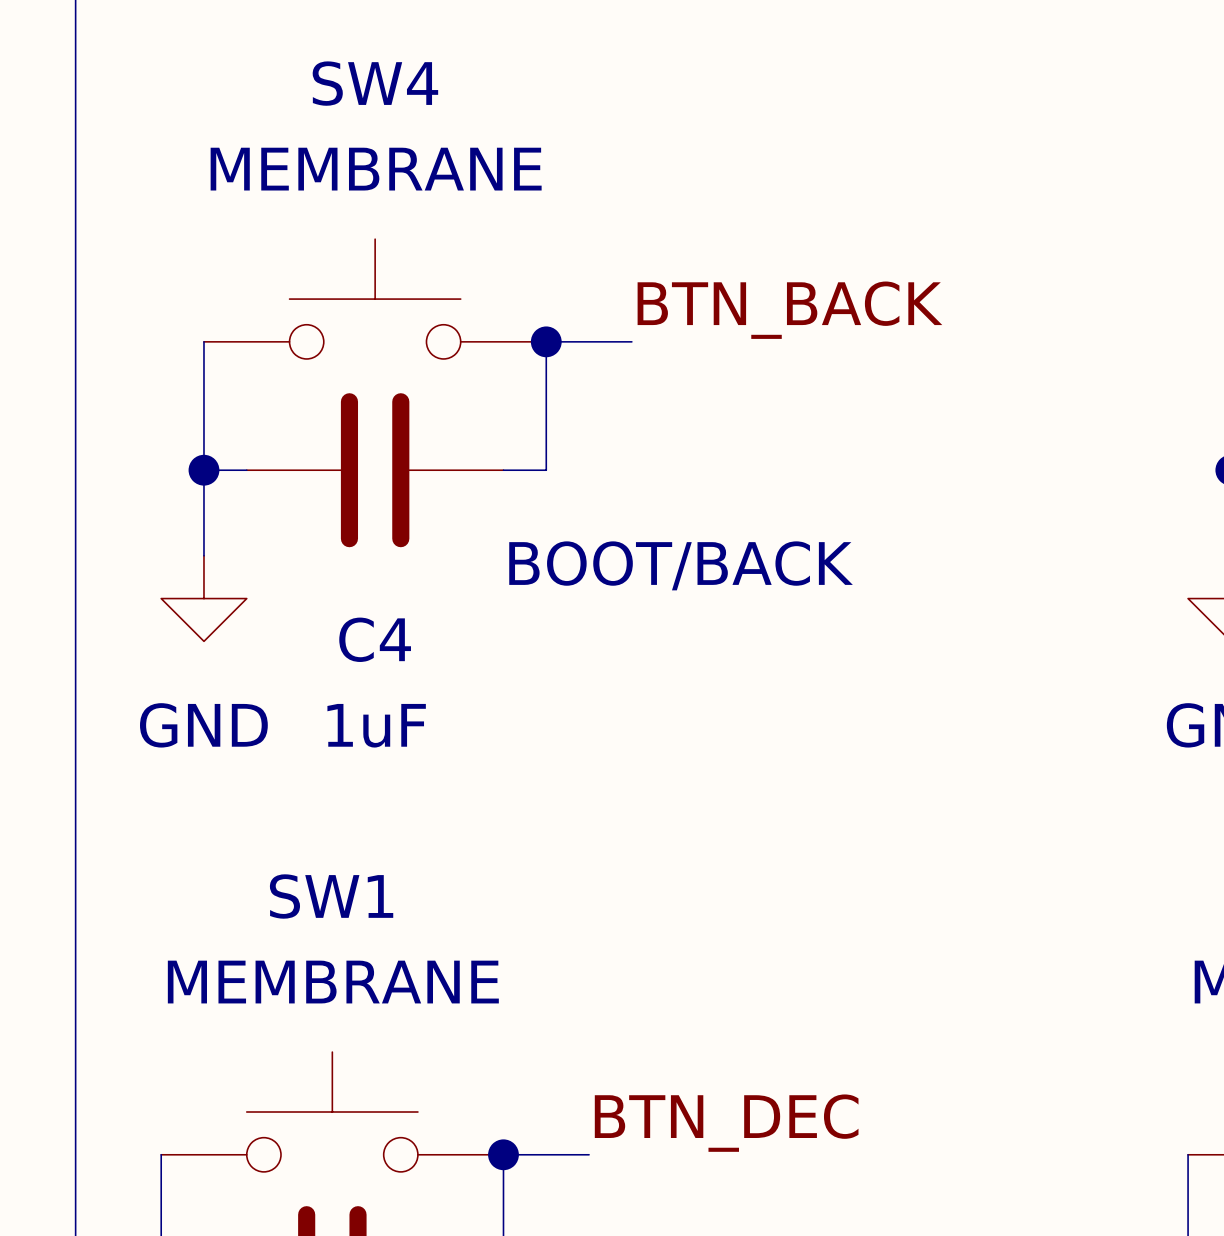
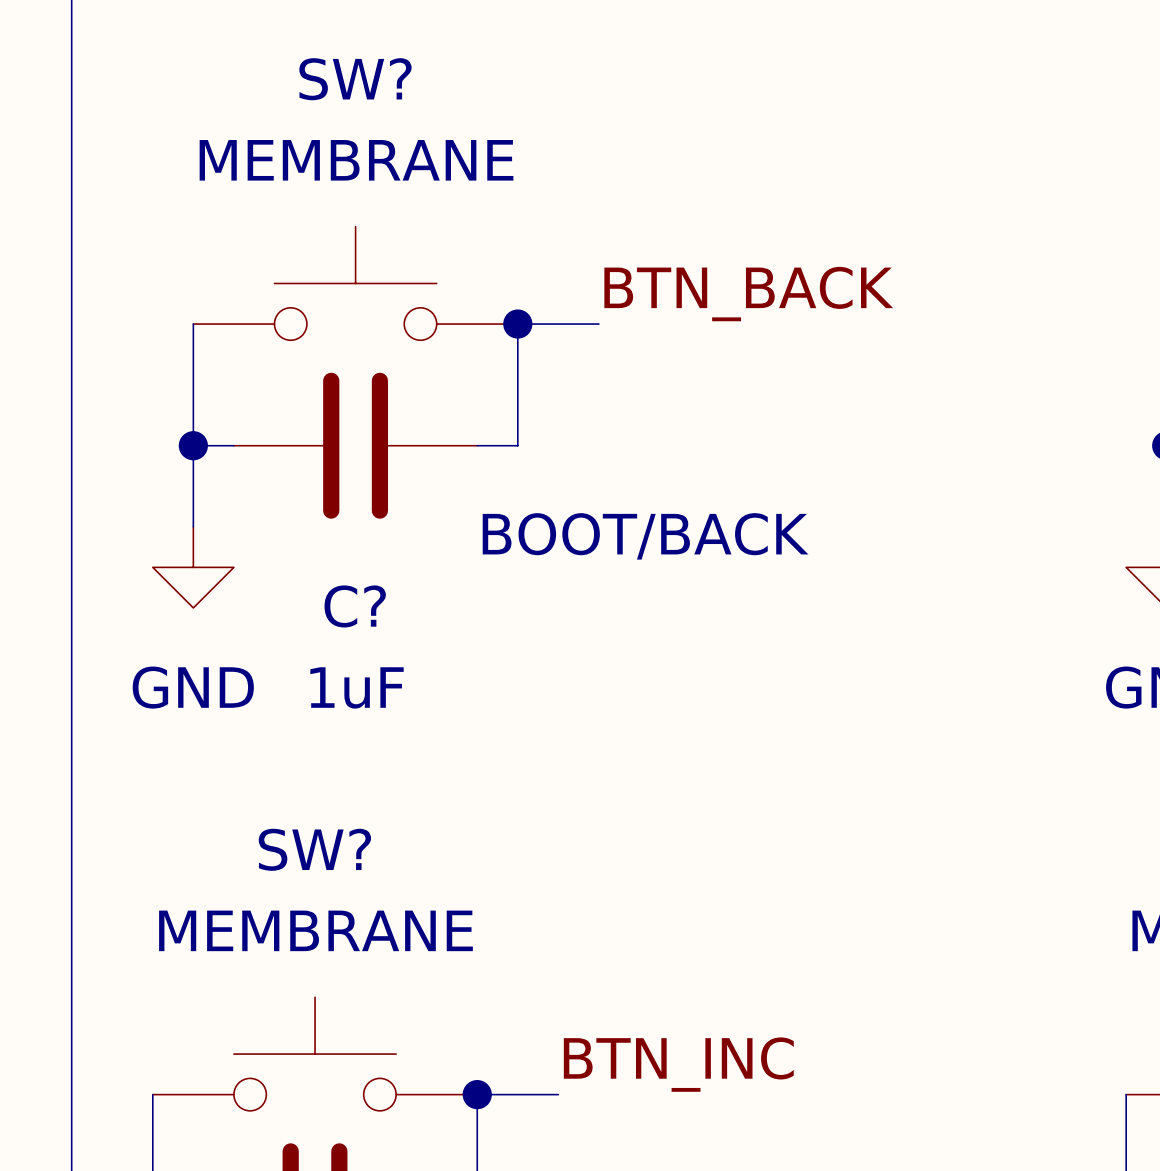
SW4 name: SW4 (375, 83) -> SW? (355, 79)
C4 name: C4 (375, 639) -> C? (355, 606)
SW1 name: SW1 (331, 896) -> SW? (314, 849)
label: BTN_DEC (726, 1123) -> BTN_INC (678, 1064)

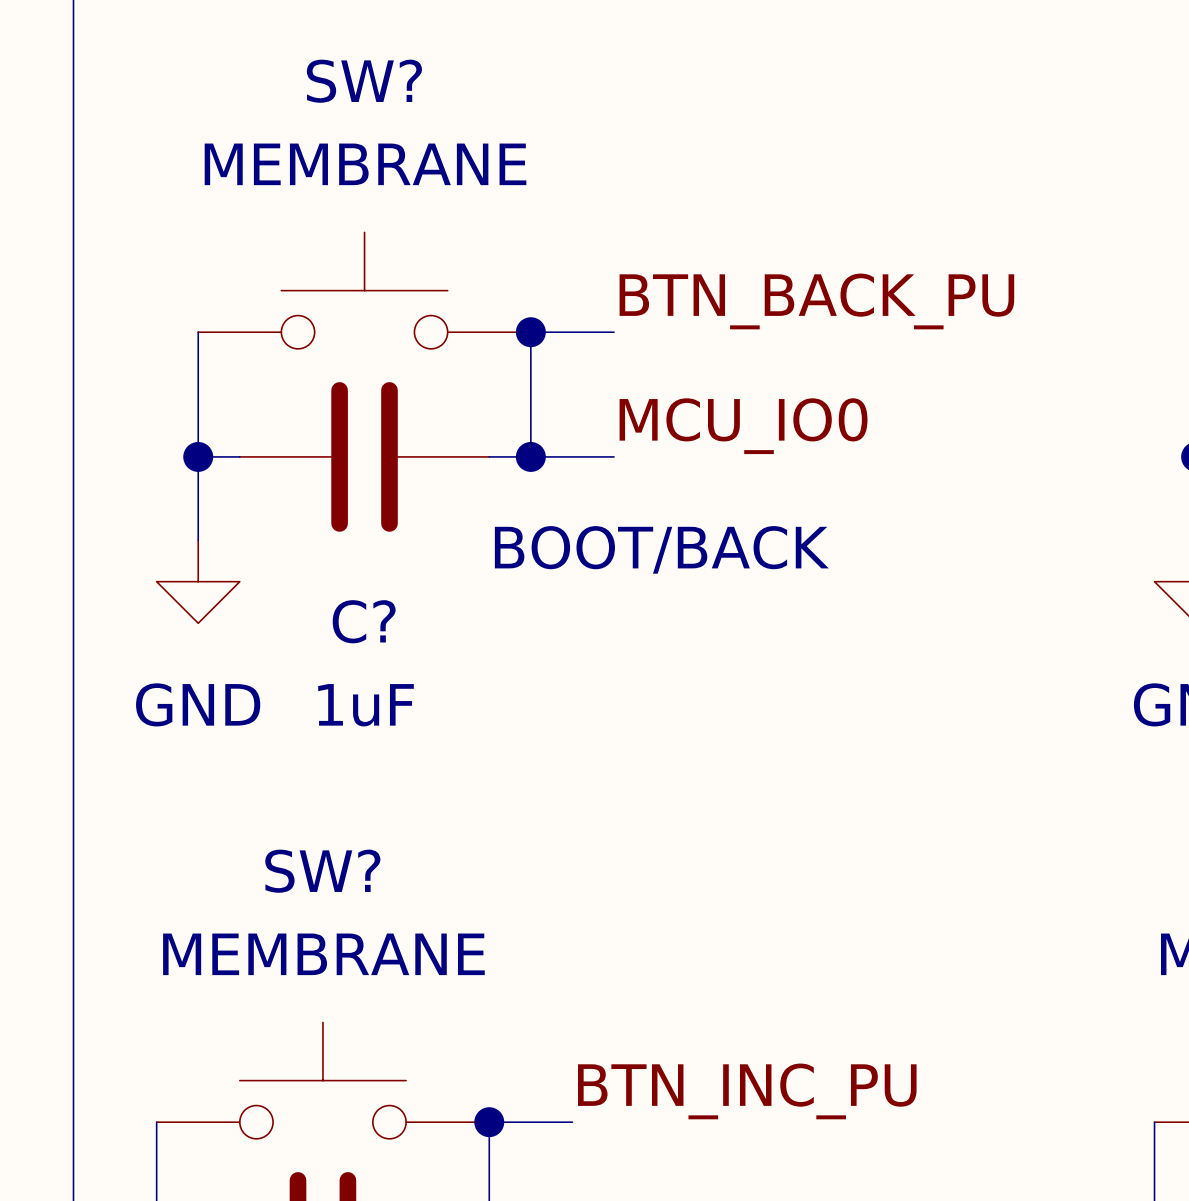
label: BTN_BACK (748, 294) -> BTN_BACK_PU (816, 301)
label: none -> MCU_IO0 (743, 426)
wire: none -> (530, 456) (614, 456)
junction: none -> (530, 456)
label: BTN_INC (678, 1064) -> BTN_INC_PU (747, 1091)

